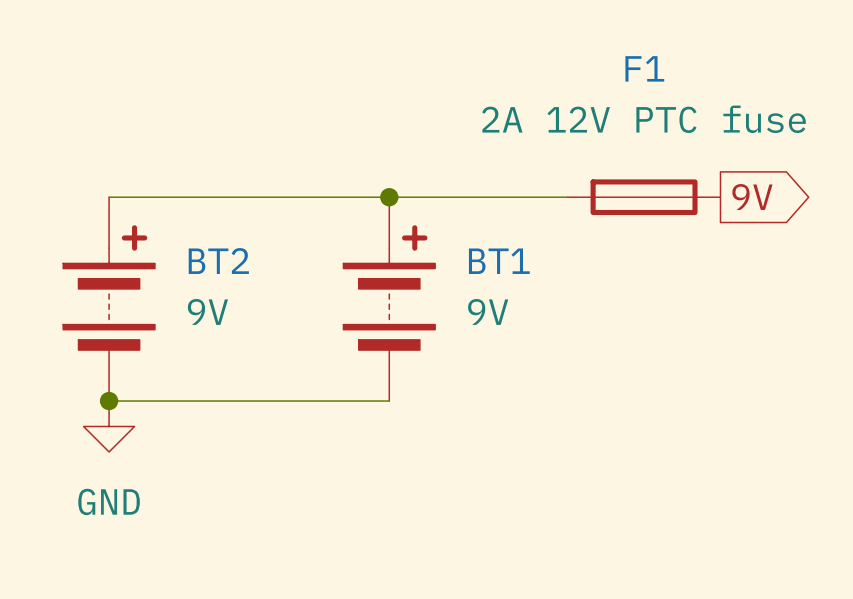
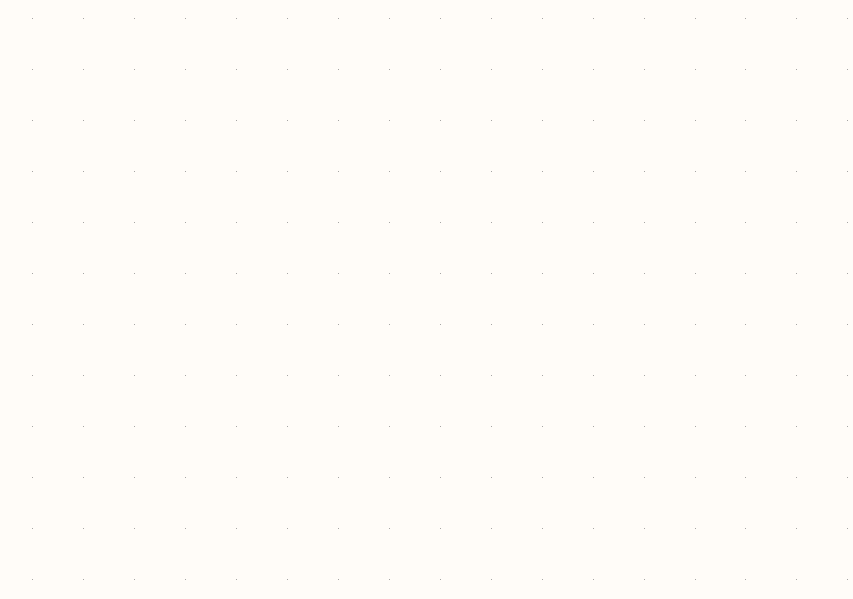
global label: 9V (752, 196) -> none
wire: (109, 197) (567, 197) -> none
junction: (389, 197) -> none
F1: 2A 12V PTC fuse (644, 197) -> none
BT2: 9V (109, 299) -> none
BT1: 9V (389, 299) -> none
wire: (109, 401) (389, 401) -> none
junction: (109, 401) -> none
power symbol: GND (109, 426) -> none

